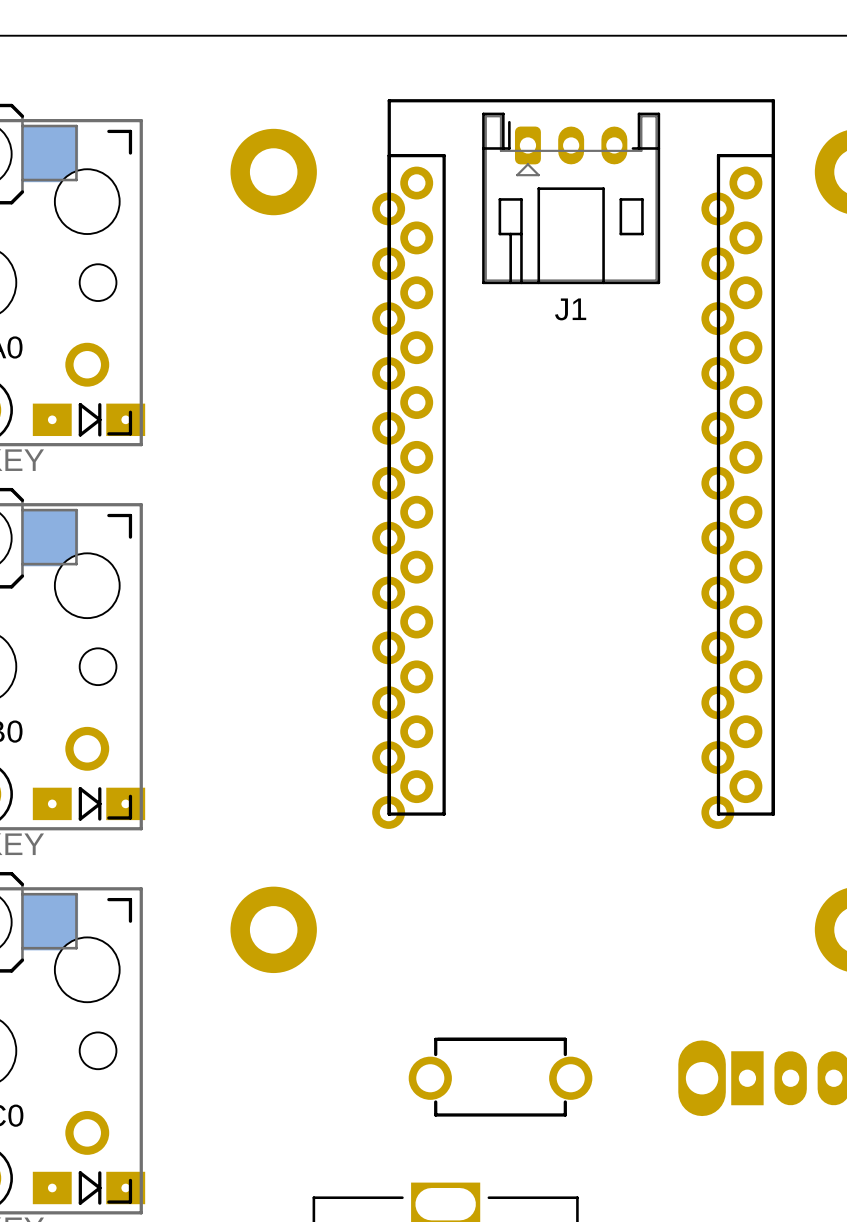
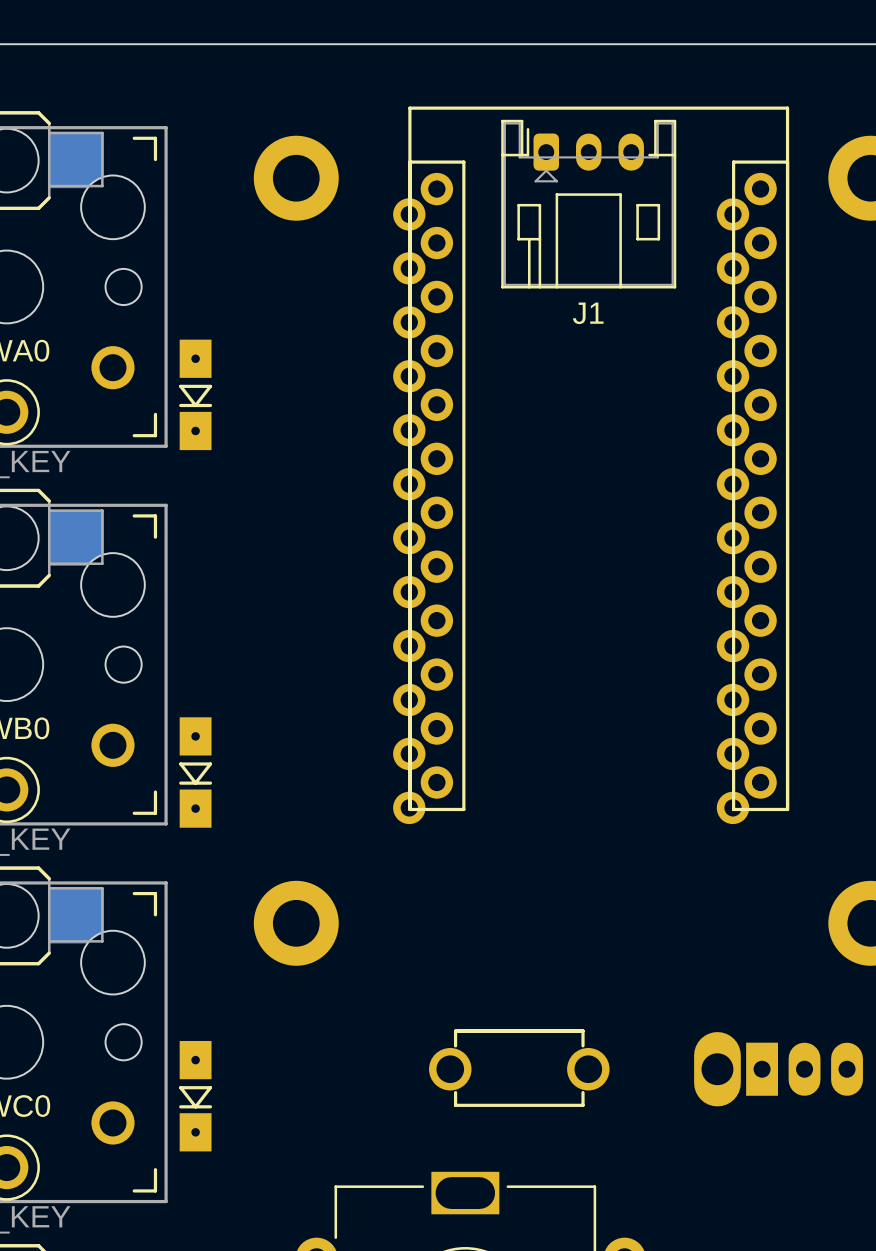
part rotation: 0° (88, 419) -> 90° clockwise (195, 394)
part position: (88, 419) -> (195, 394)
part rotation: 0° (88, 803) -> 90° clockwise (195, 772)
part position: (88, 803) -> (195, 772)
part rotation: 0° (88, 1187) -> 90° clockwise (195, 1096)
part position: (88, 1187) -> (195, 1096)

